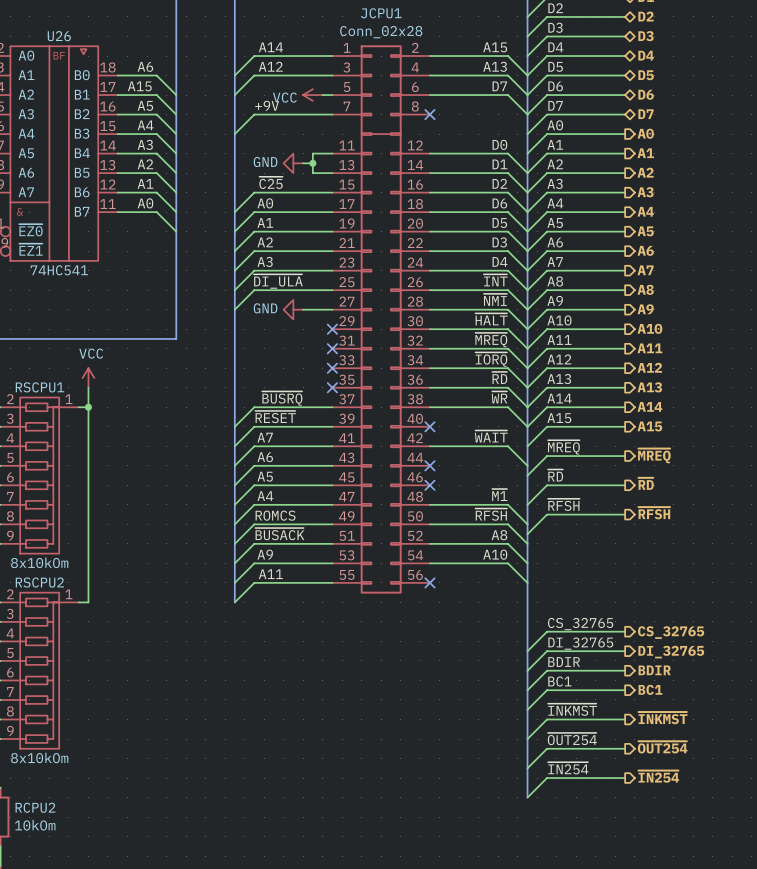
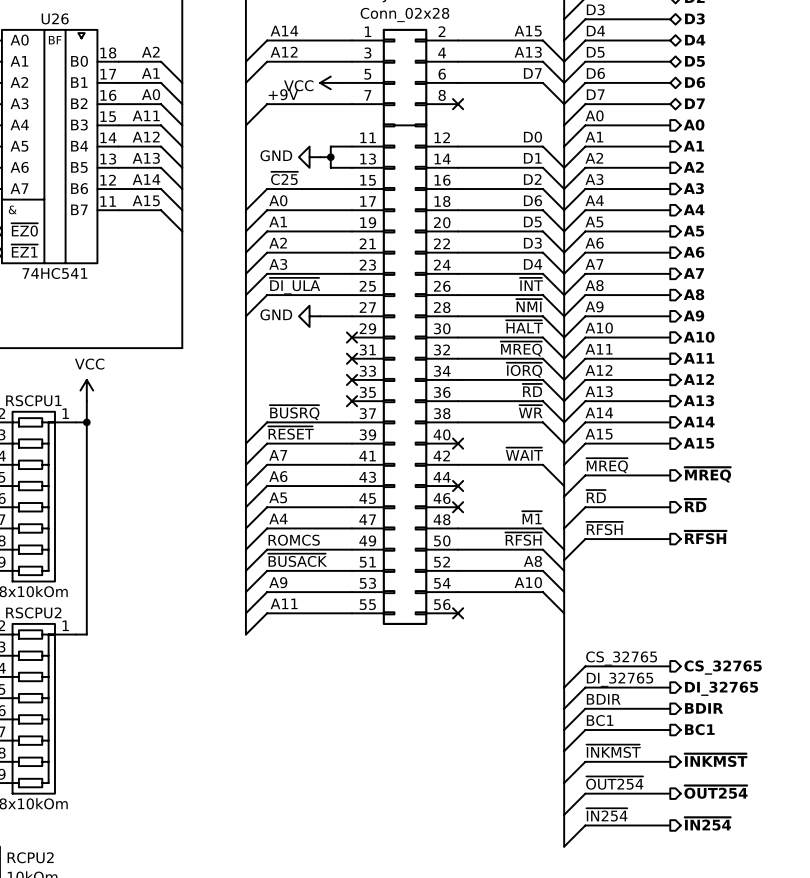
label: A6 (145, 66) -> none
label position: A15 (139, 86) -> A15 (146, 200)
label: A5 (145, 105) -> none
label: none -> A11 (146, 115)
label: A4 (145, 125) -> none
label: none -> A12 (146, 137)
label: A3 (145, 144) -> A13 (146, 158)
label position: A2 (145, 164) -> A2 (150, 52)
label: none -> A14 (146, 179)
label position: A1 (145, 183) -> A1 (150, 73)
label position: A0 (145, 203) -> A0 (151, 94)

